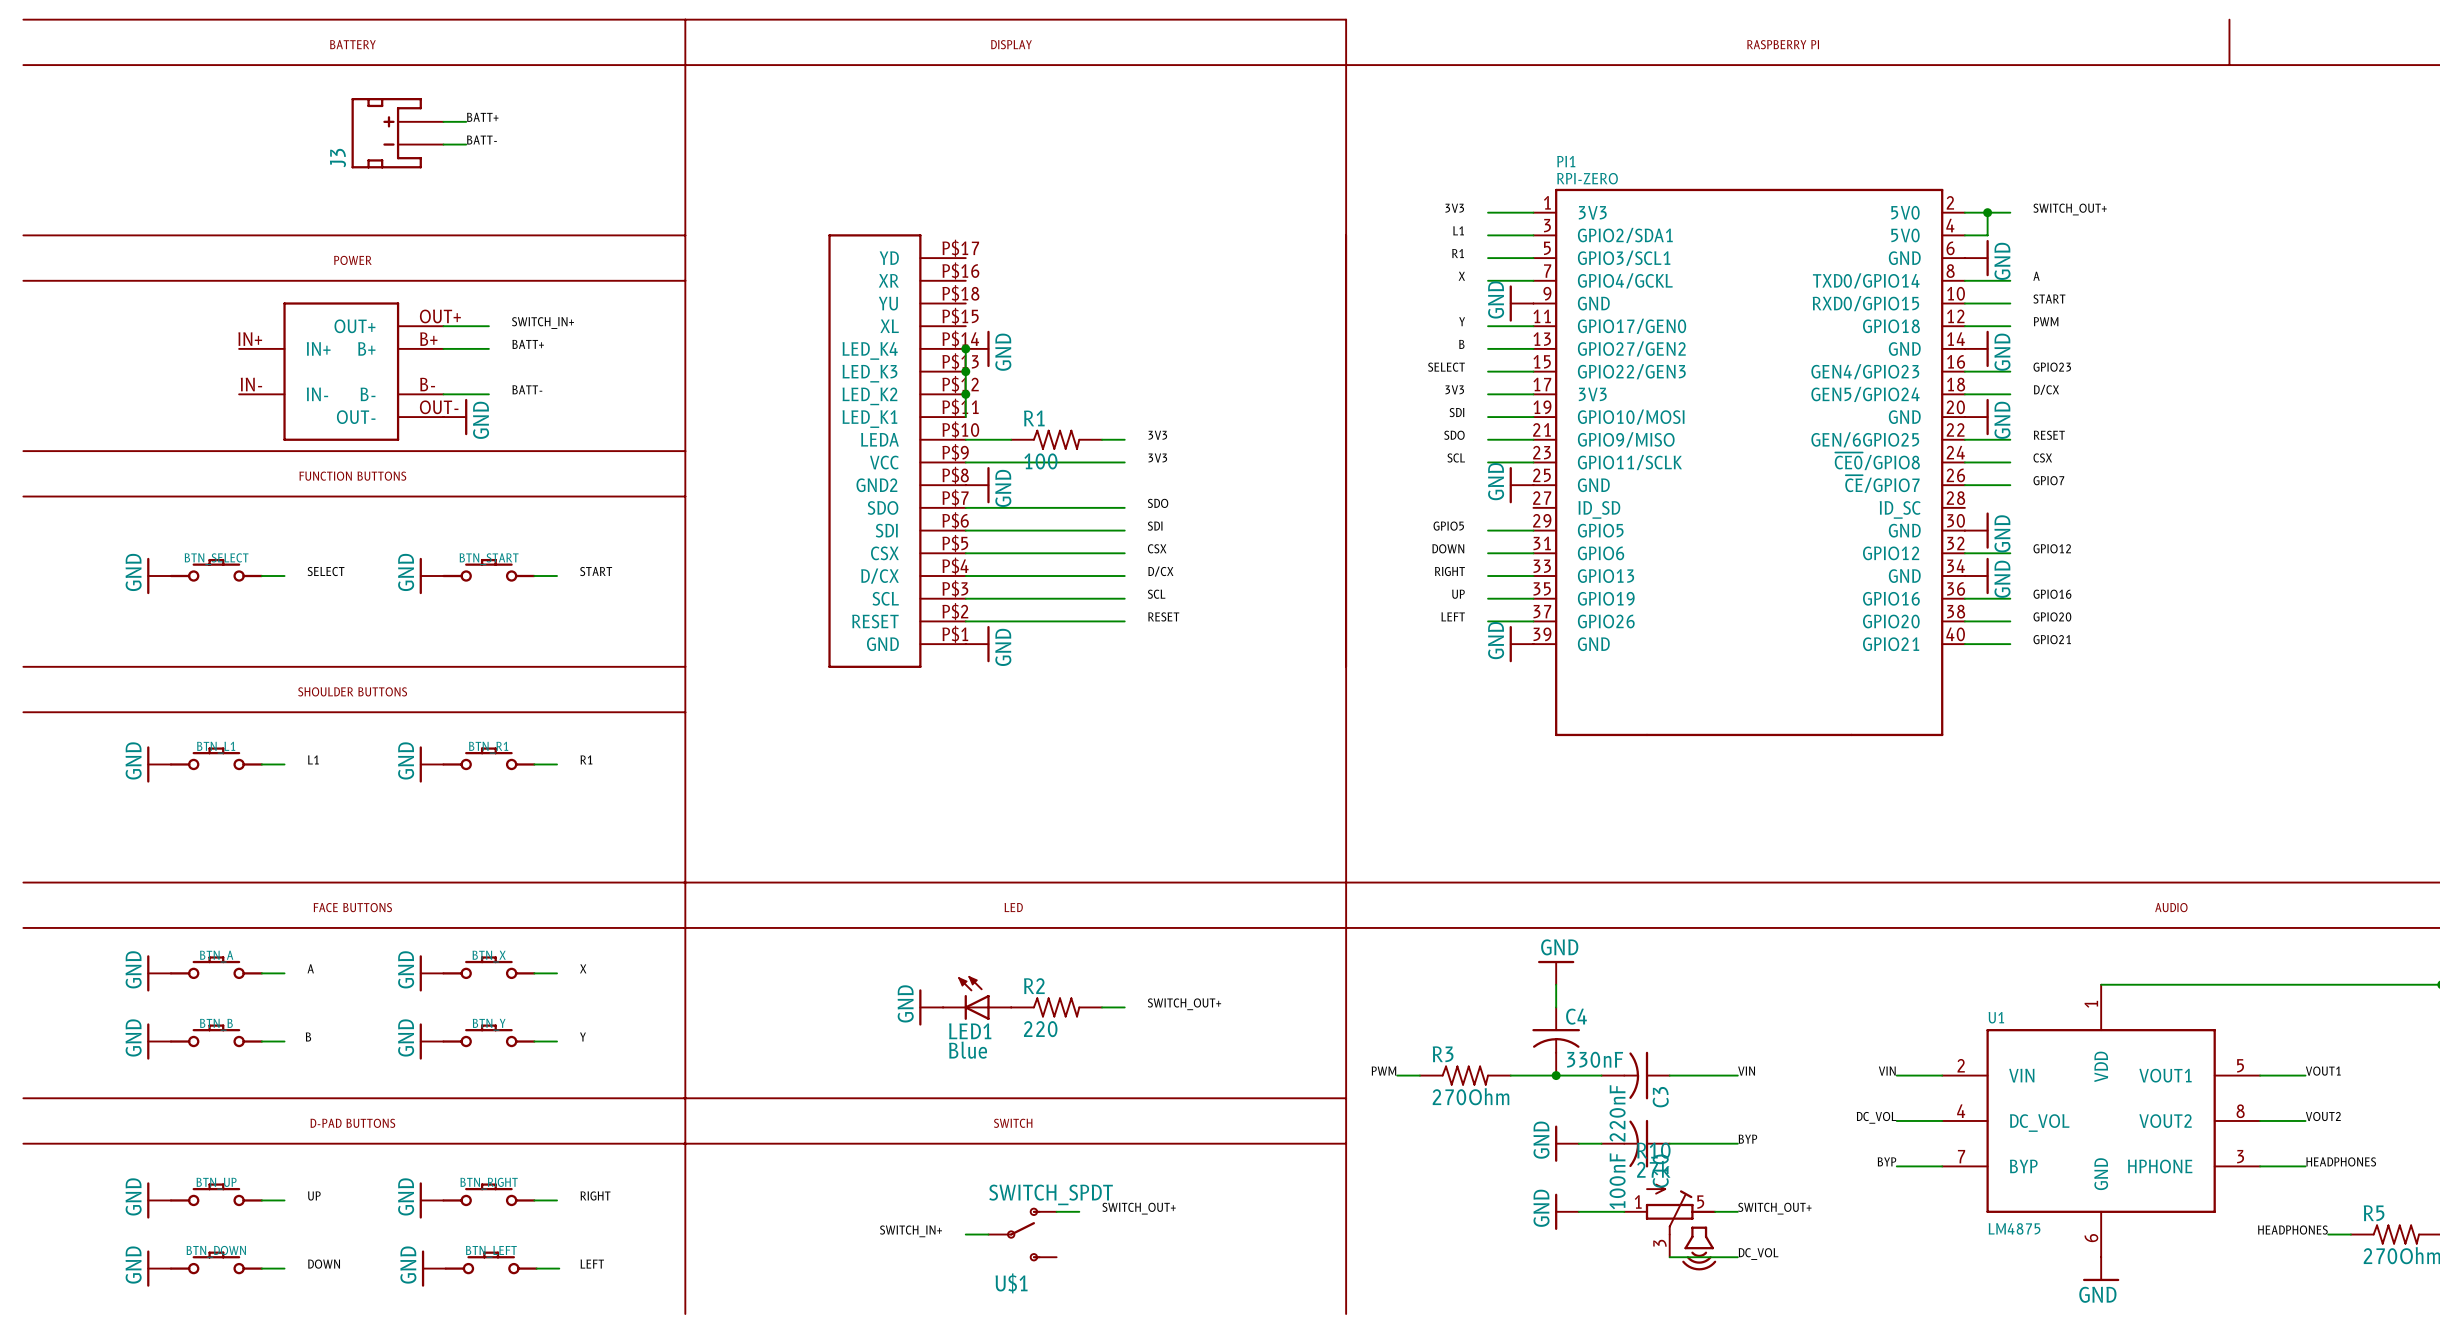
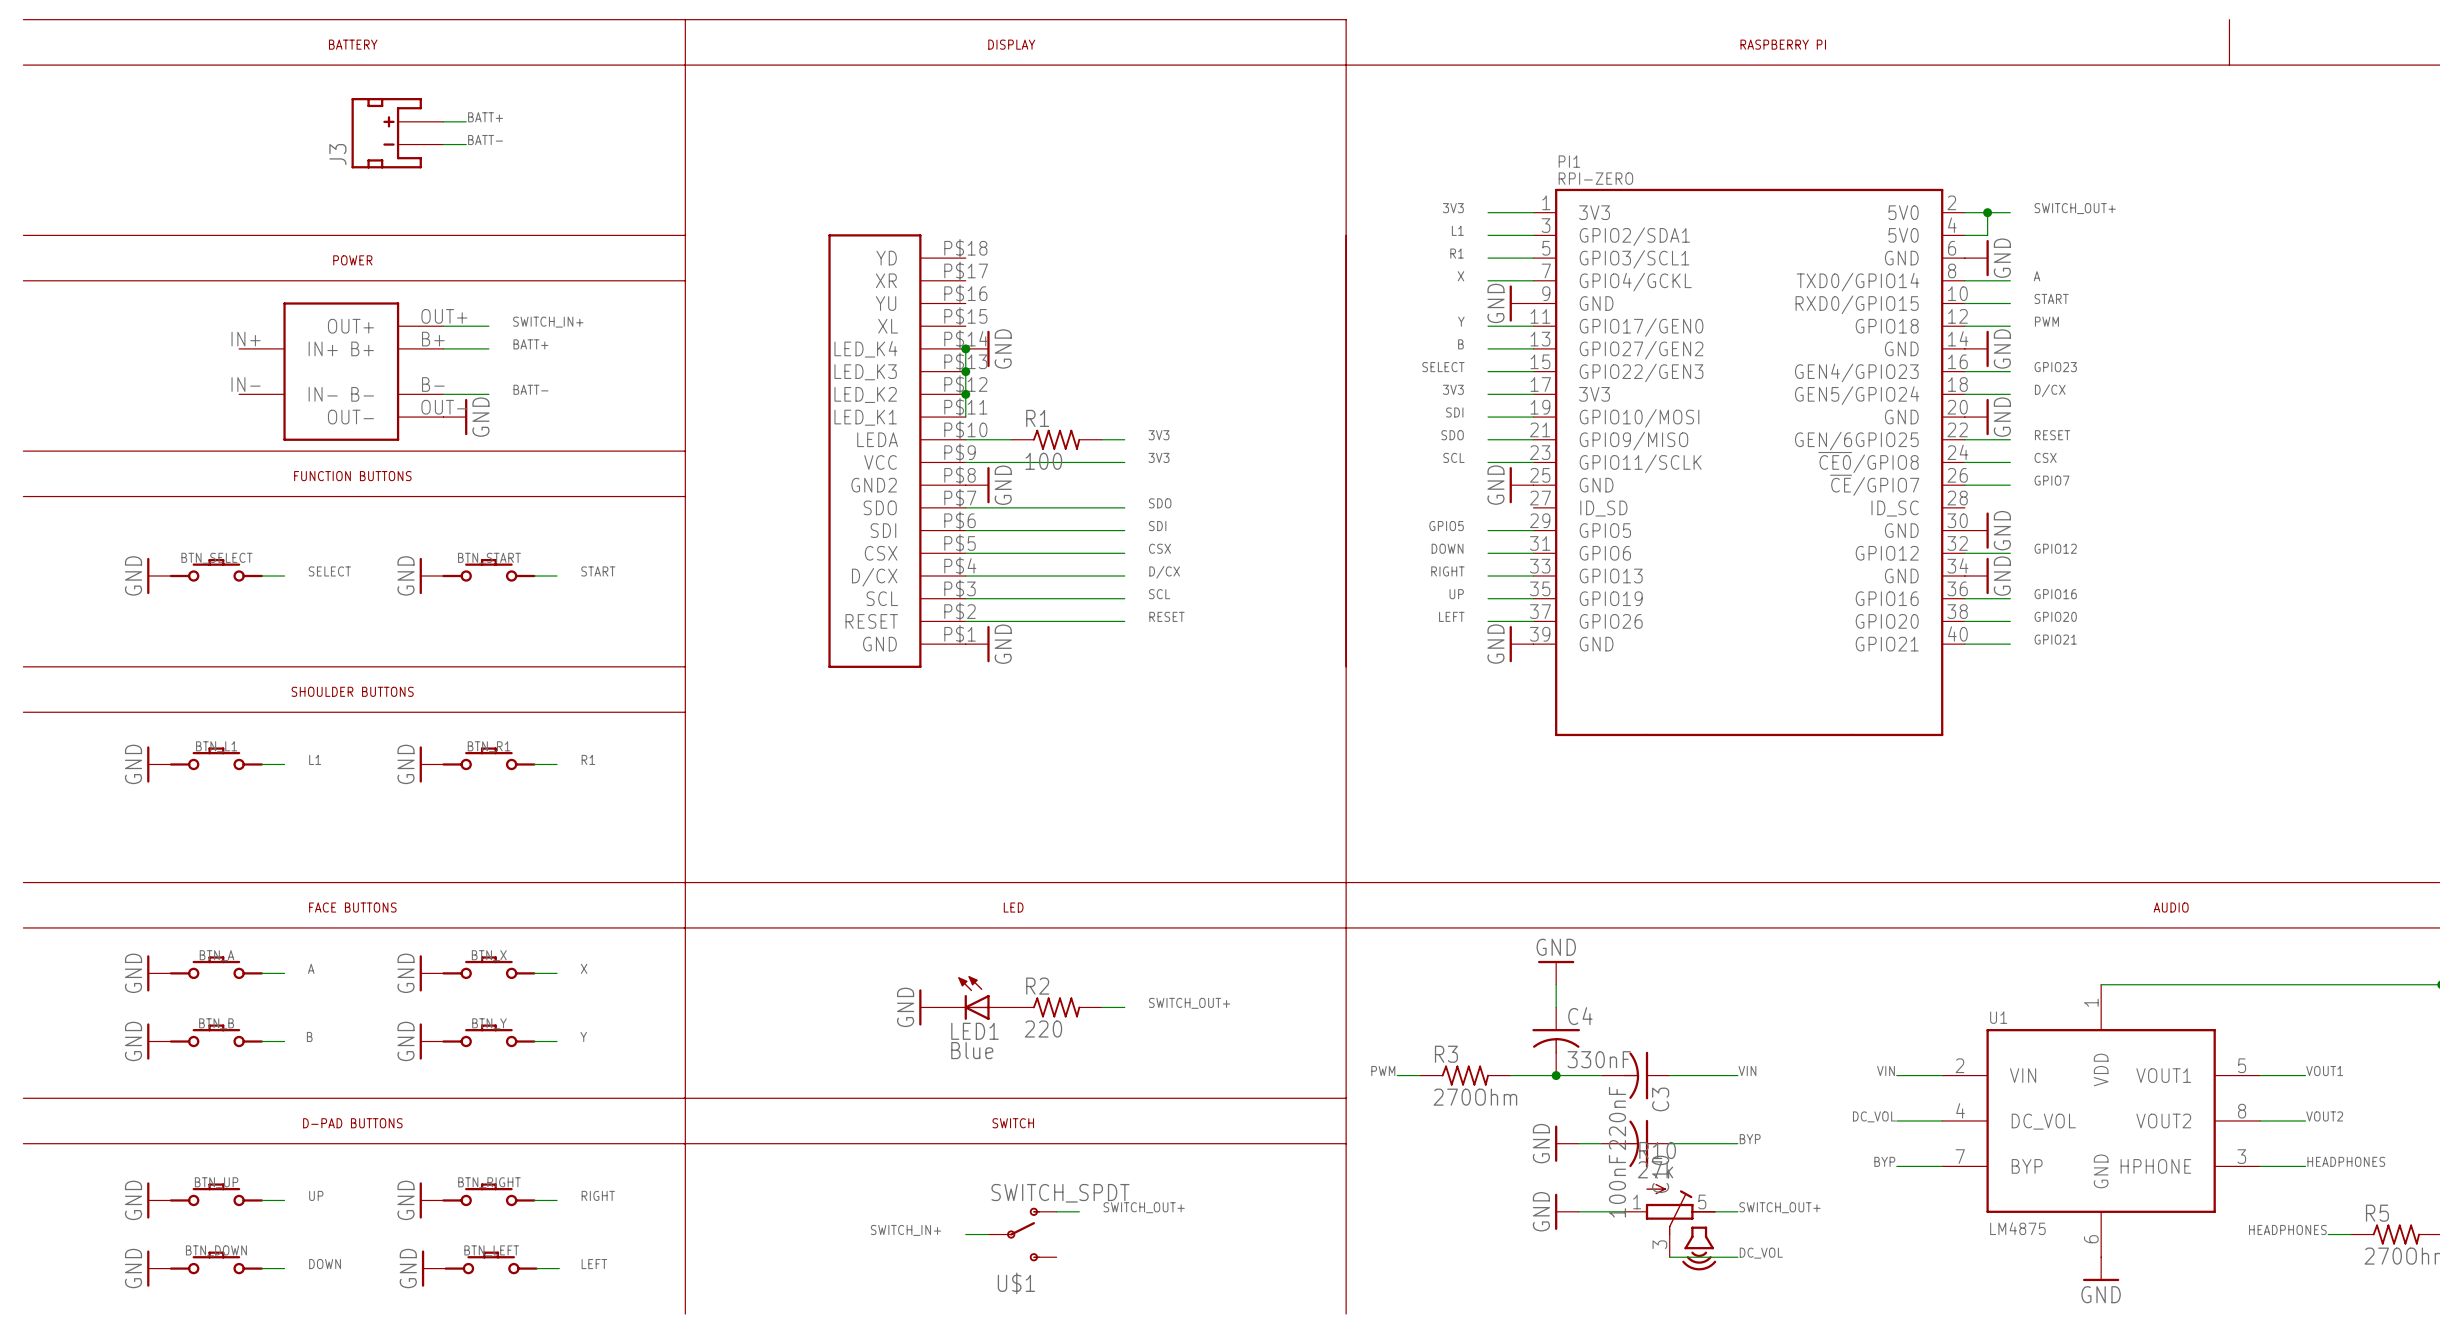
part pin number: P$17 (960, 248) -> P$18 (965, 248)
part pin number: P$16 (960, 270) -> P$17 (966, 270)
part pin number: P$18 (960, 293) -> P$16 (965, 293)

